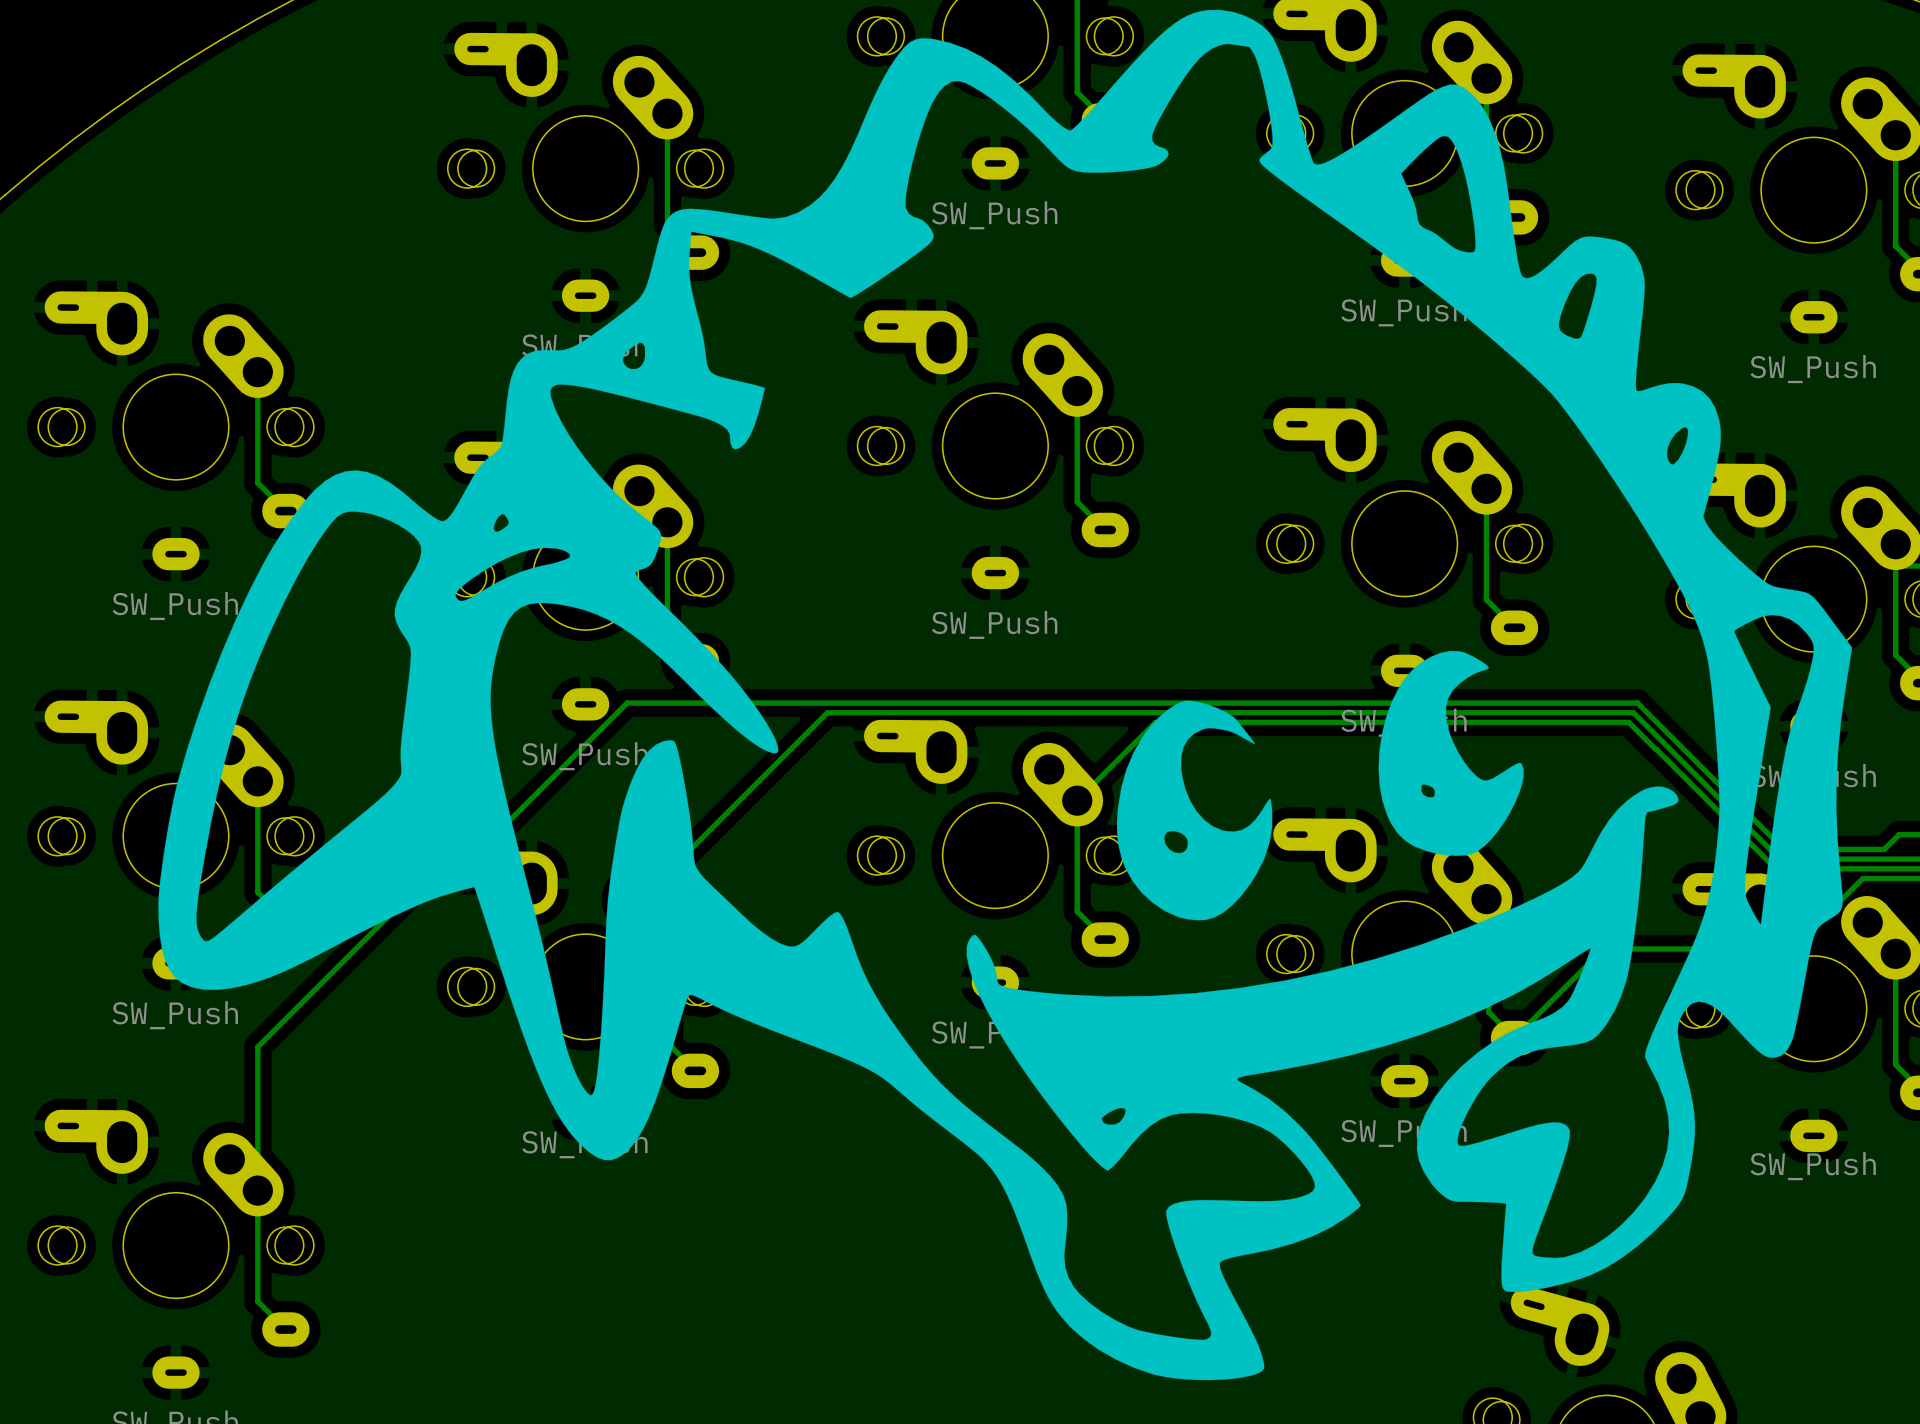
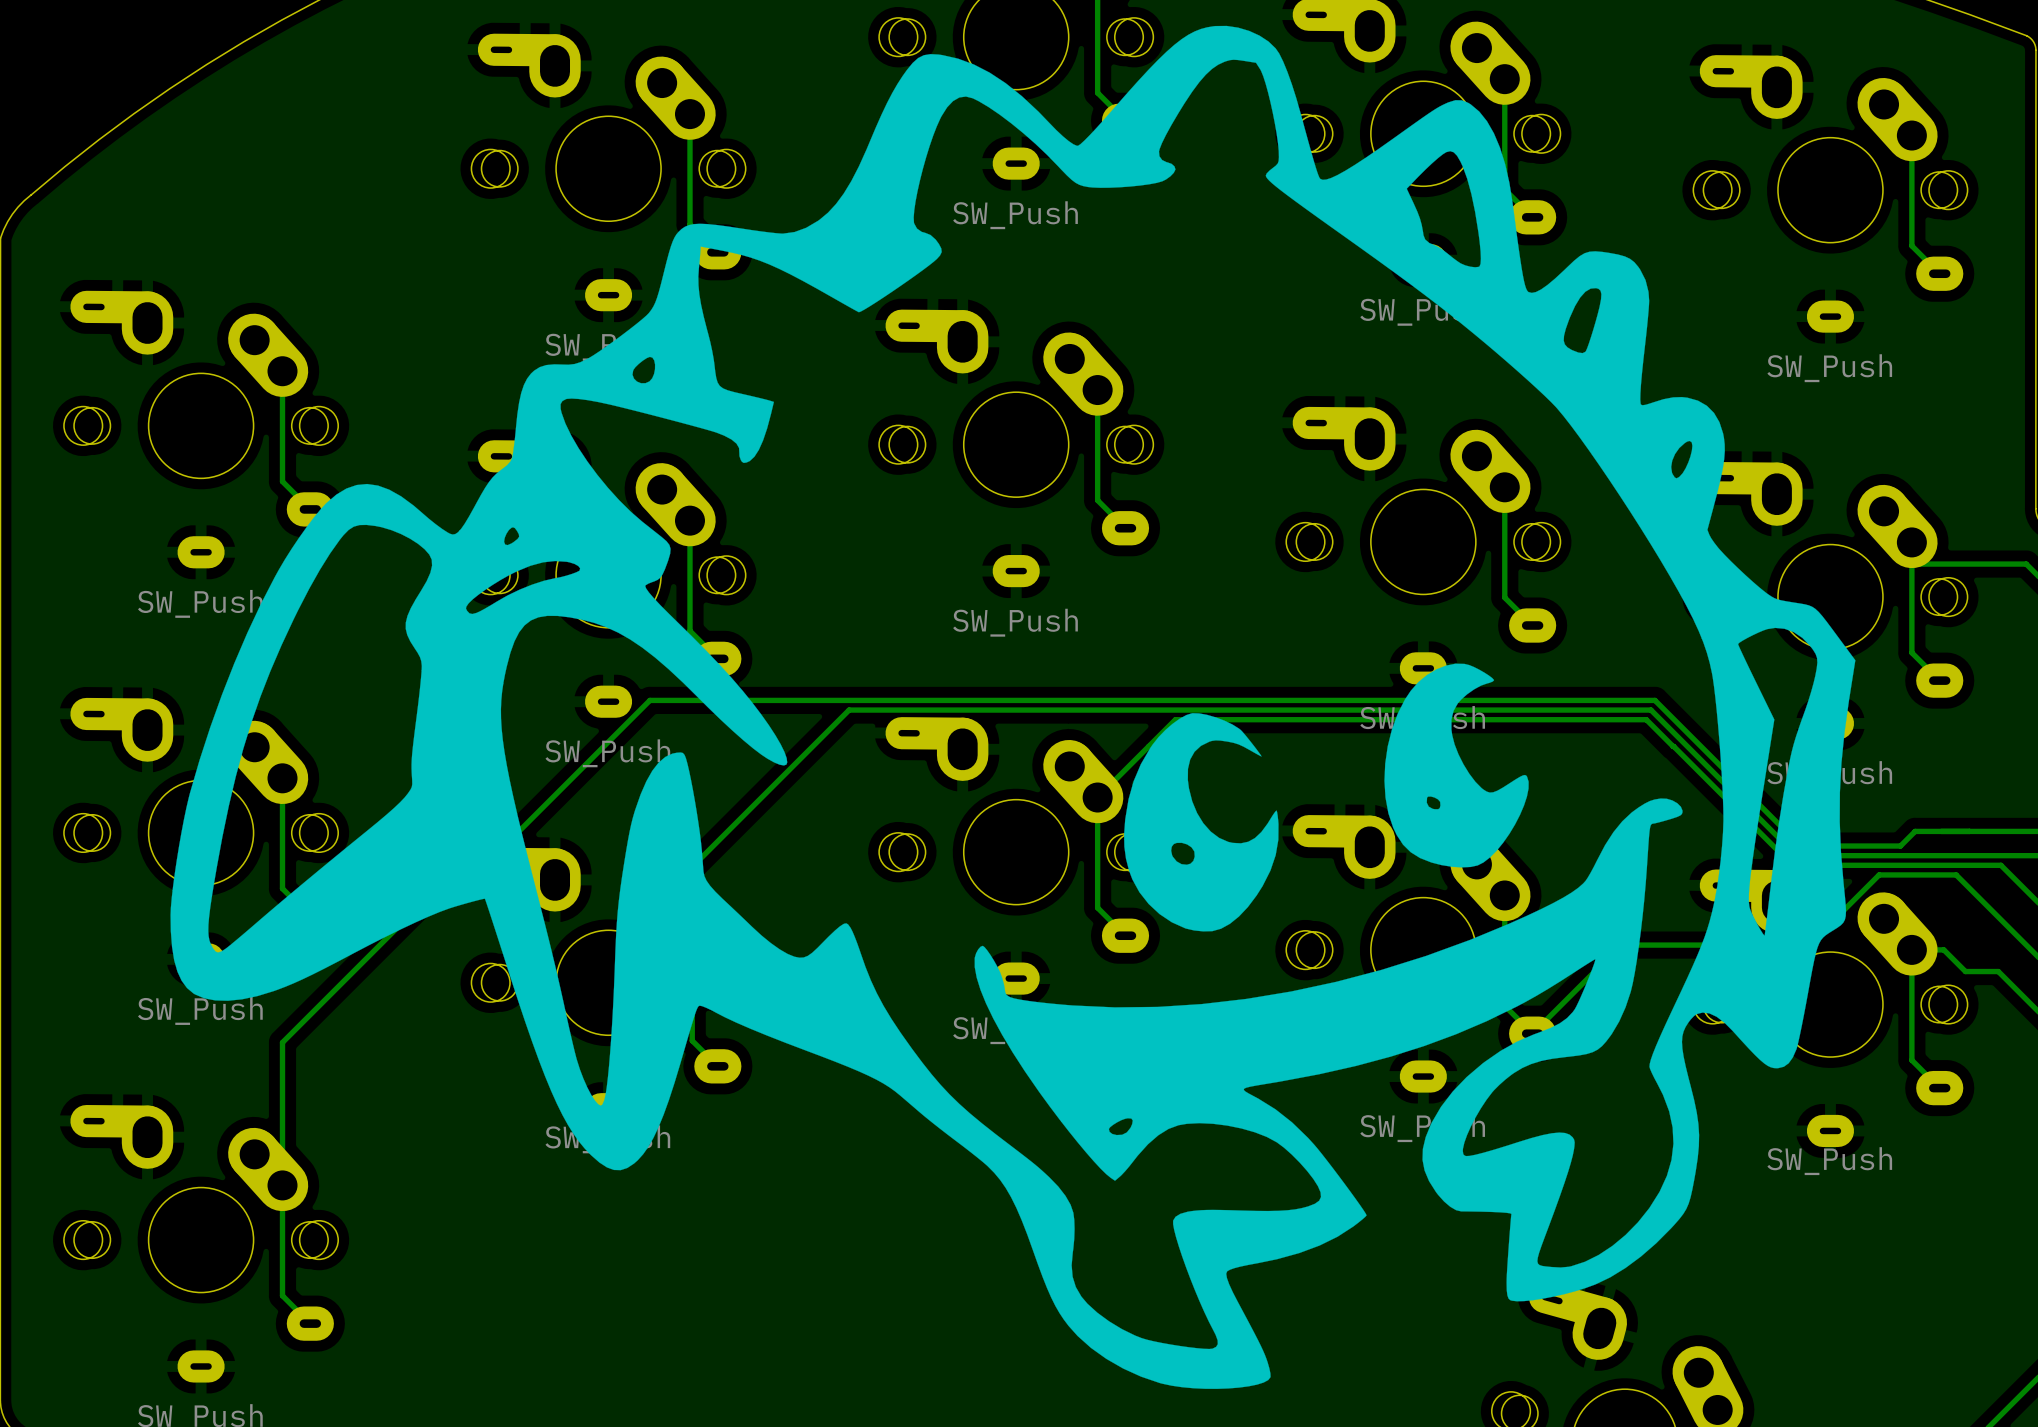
drawing position: (1005, 695) -> (1012, 707)

